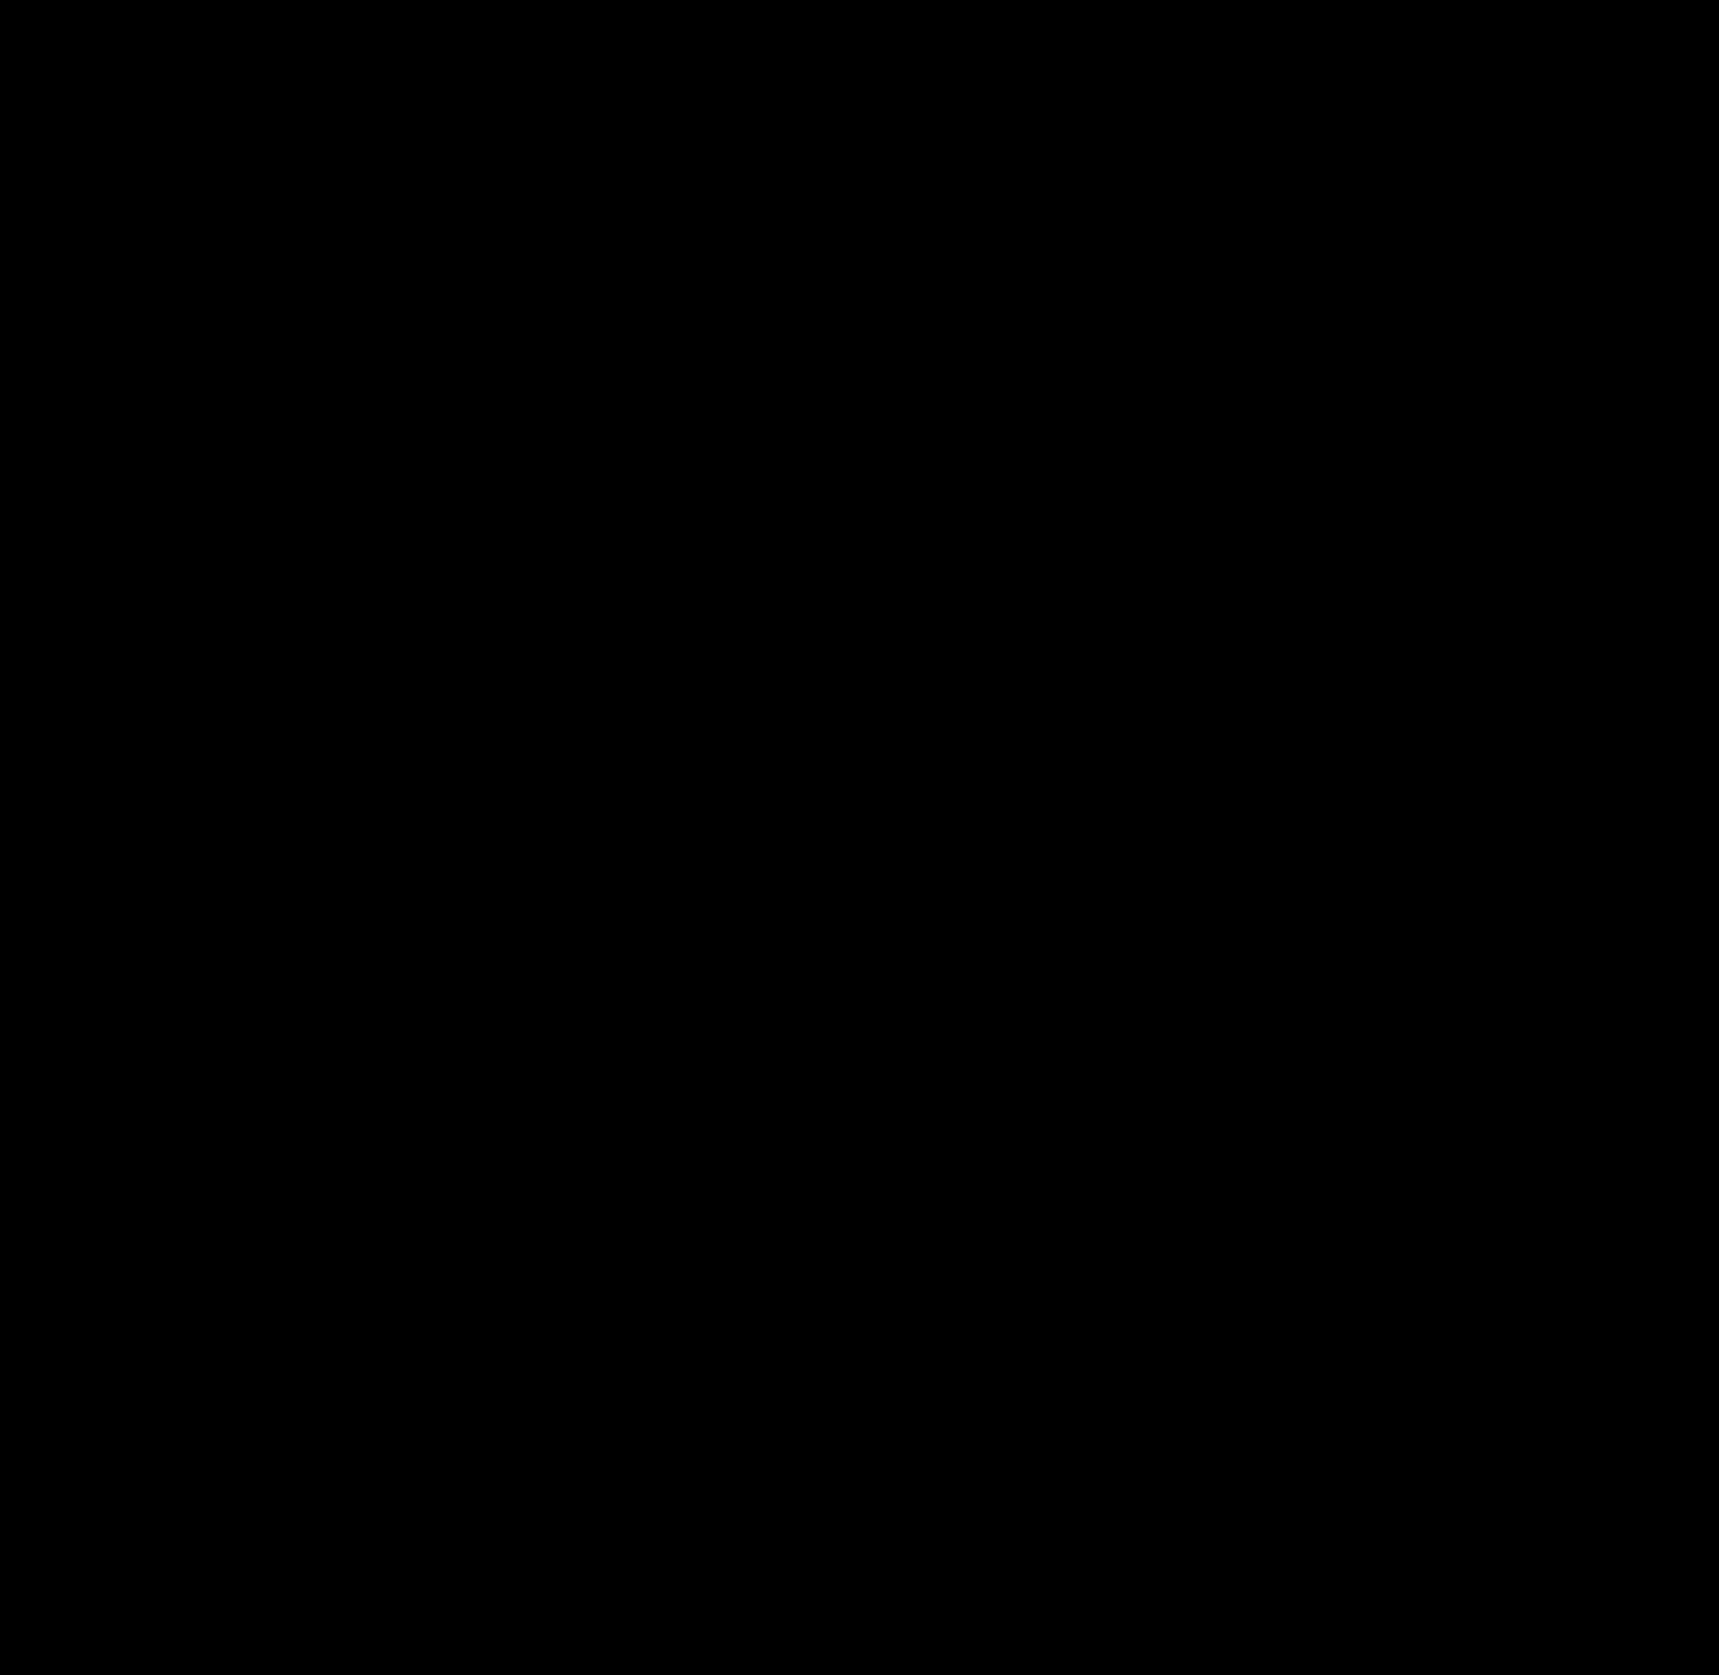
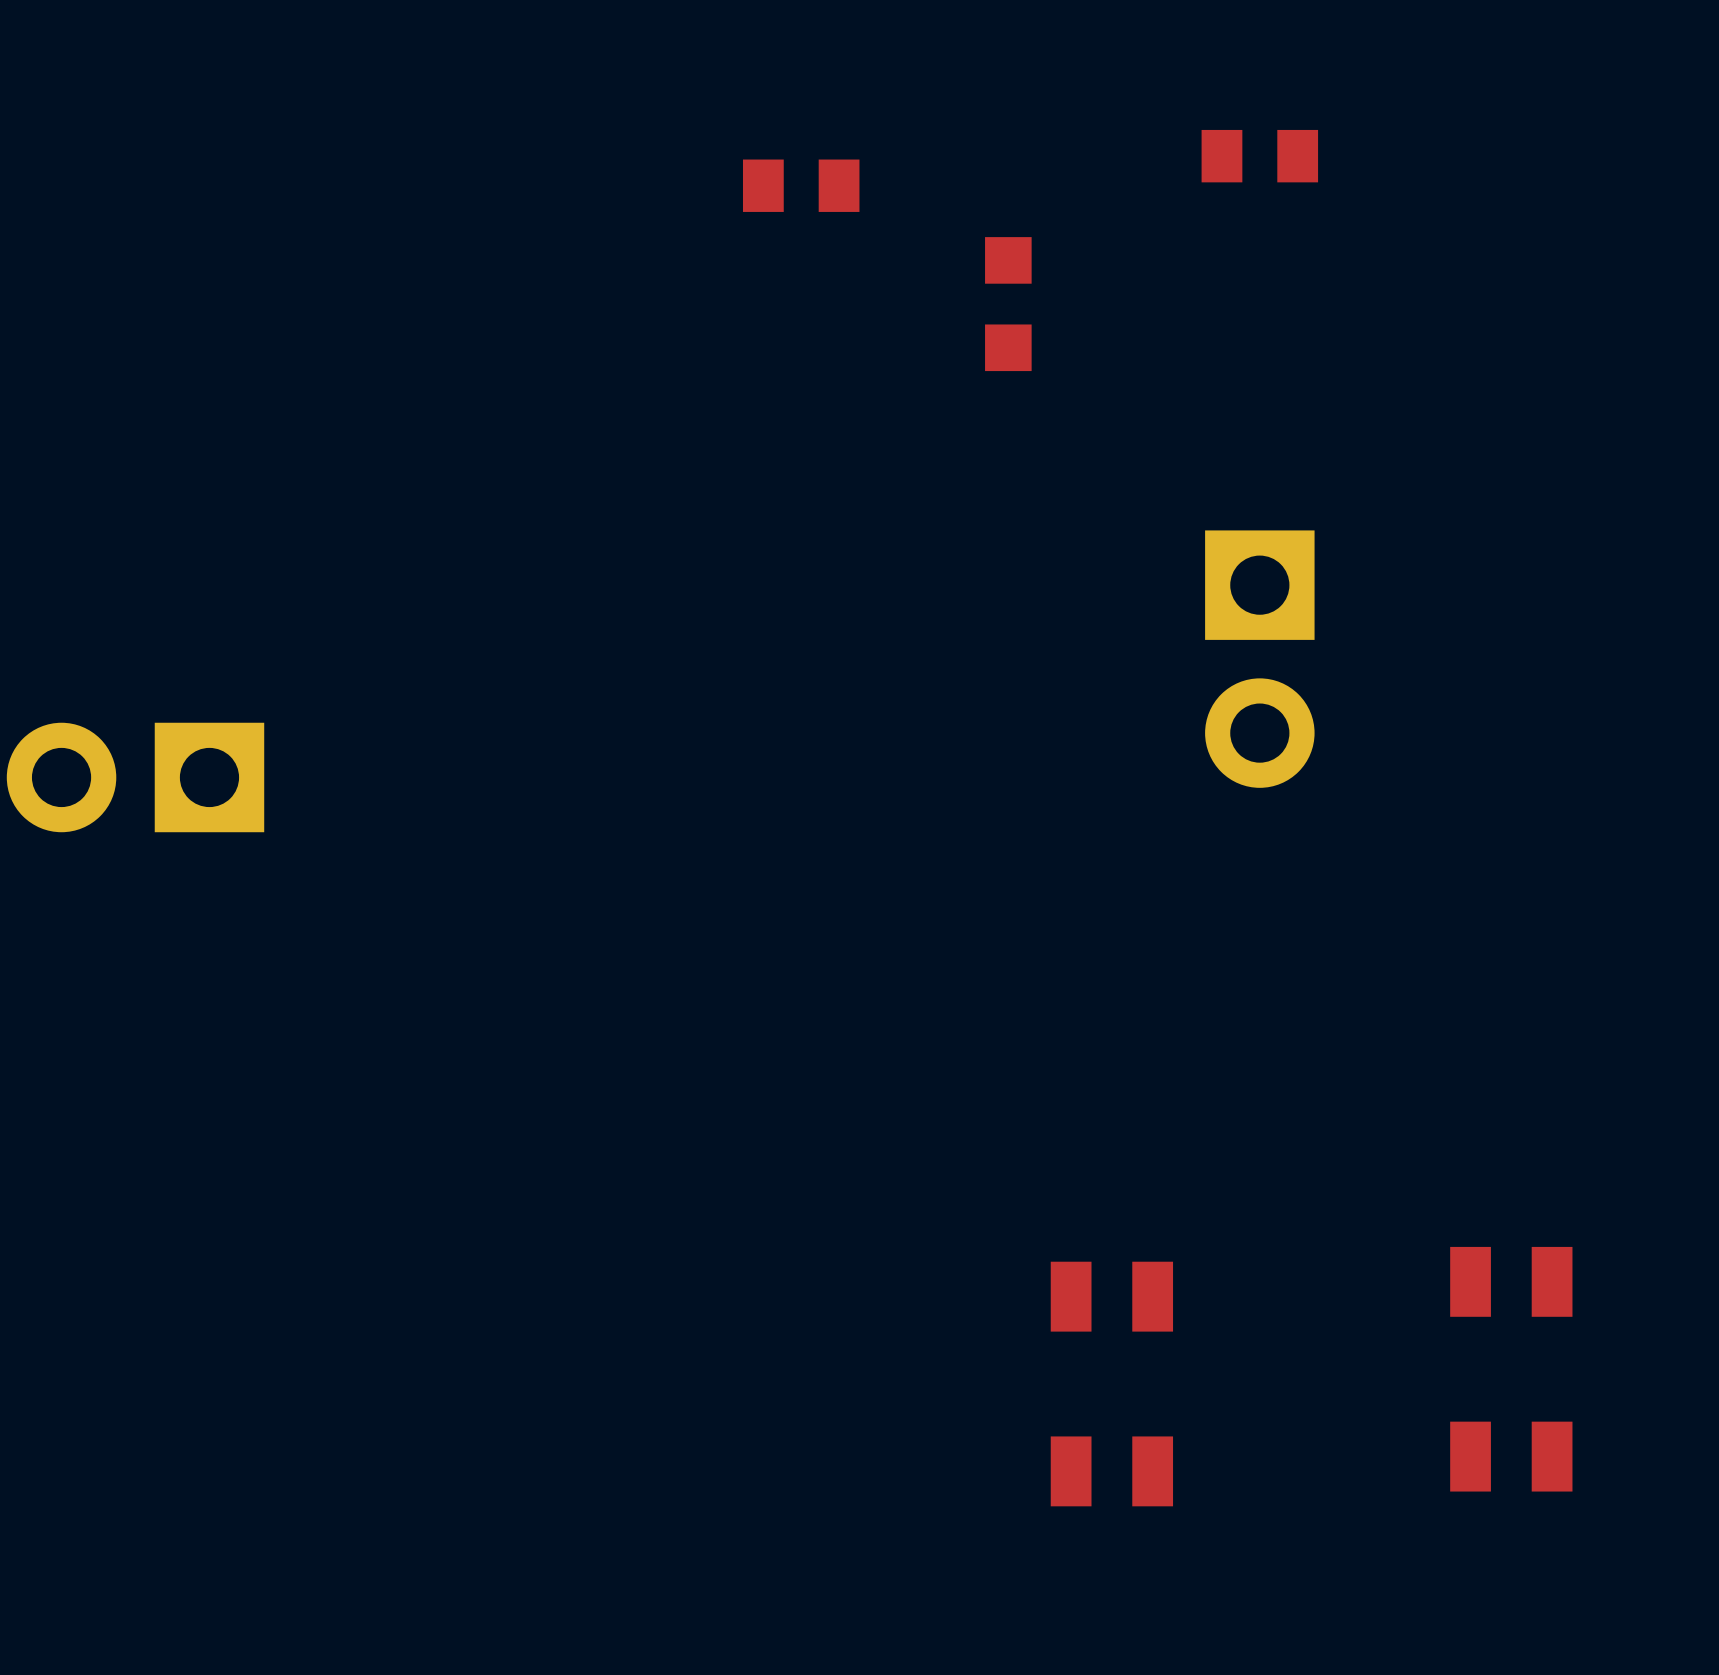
part: none -> (1259, 156)
part: none -> (801, 185)
part: none -> (1008, 304)
part: none -> (1259, 659)
part: none -> (135, 777)
part: none -> (1511, 1369)
part: none -> (1111, 1384)

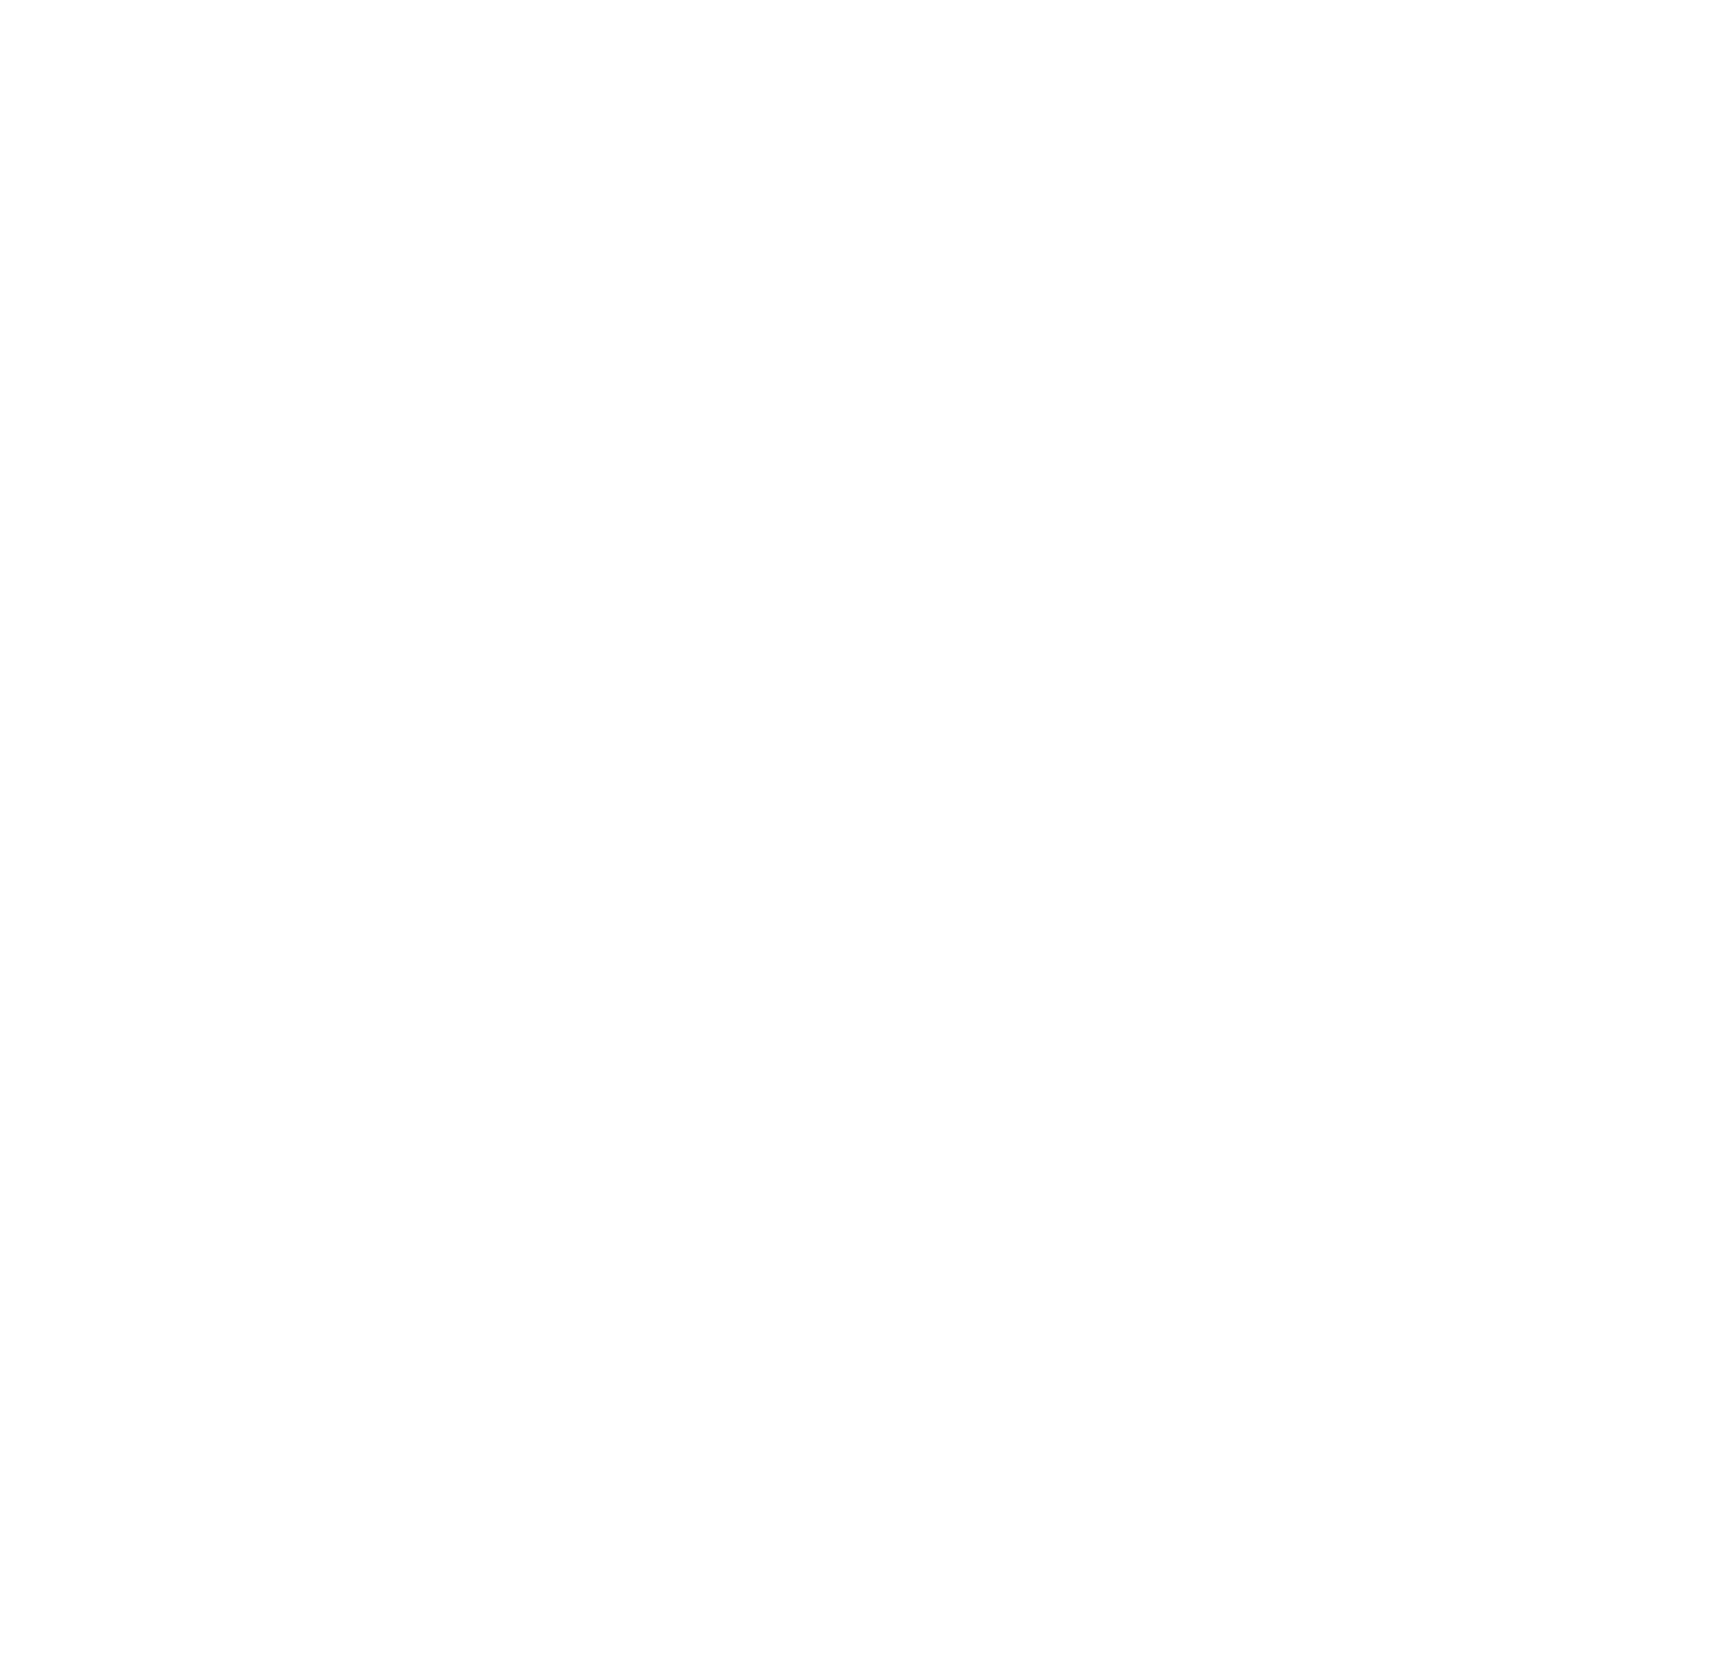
part: (1259, 156) -> none
part: (801, 185) -> none
part: (1008, 304) -> none
part: (1259, 659) -> none
part: (135, 777) -> none
part: (1511, 1369) -> none
part: (1111, 1384) -> none

